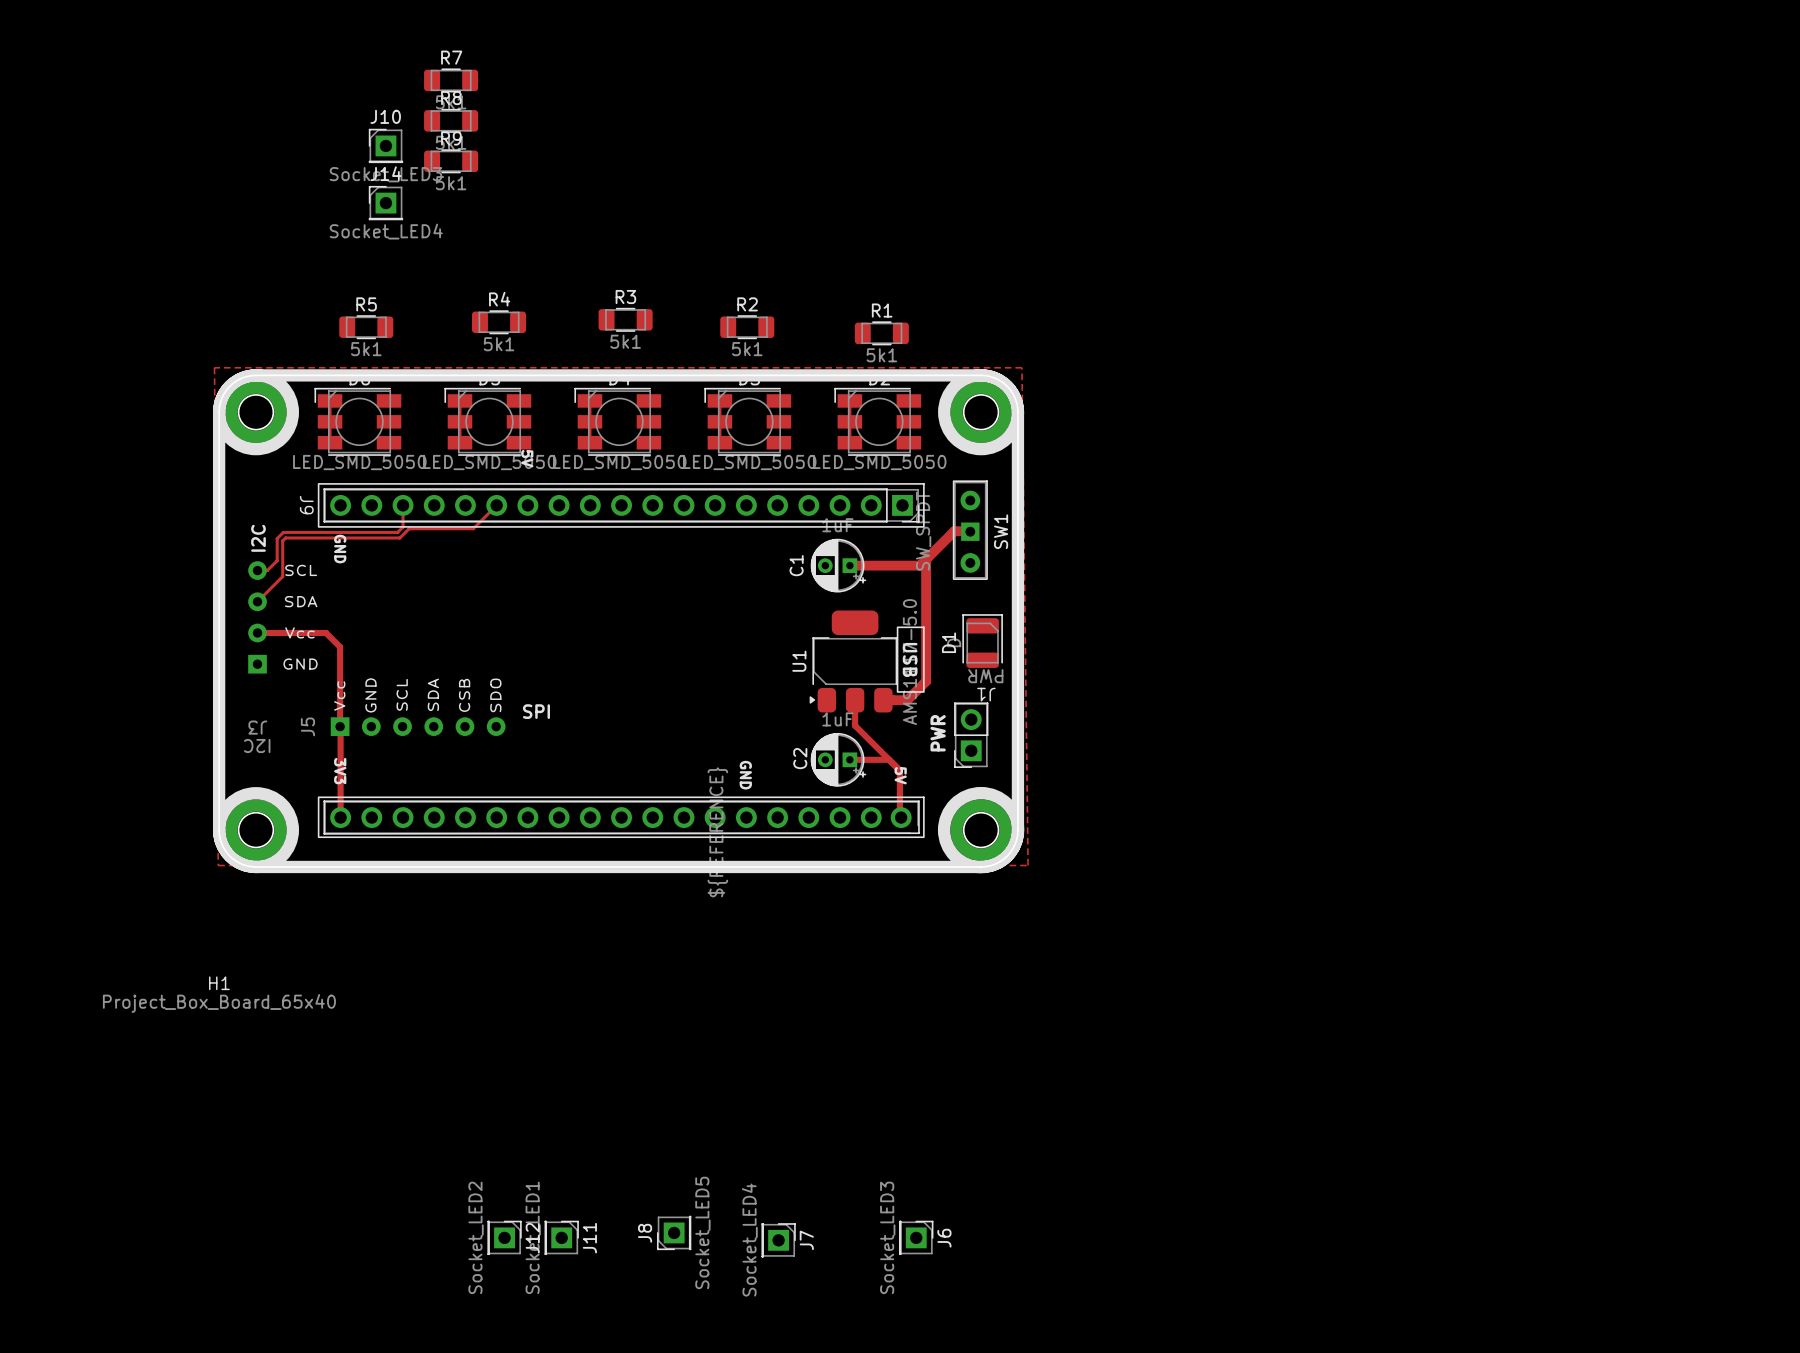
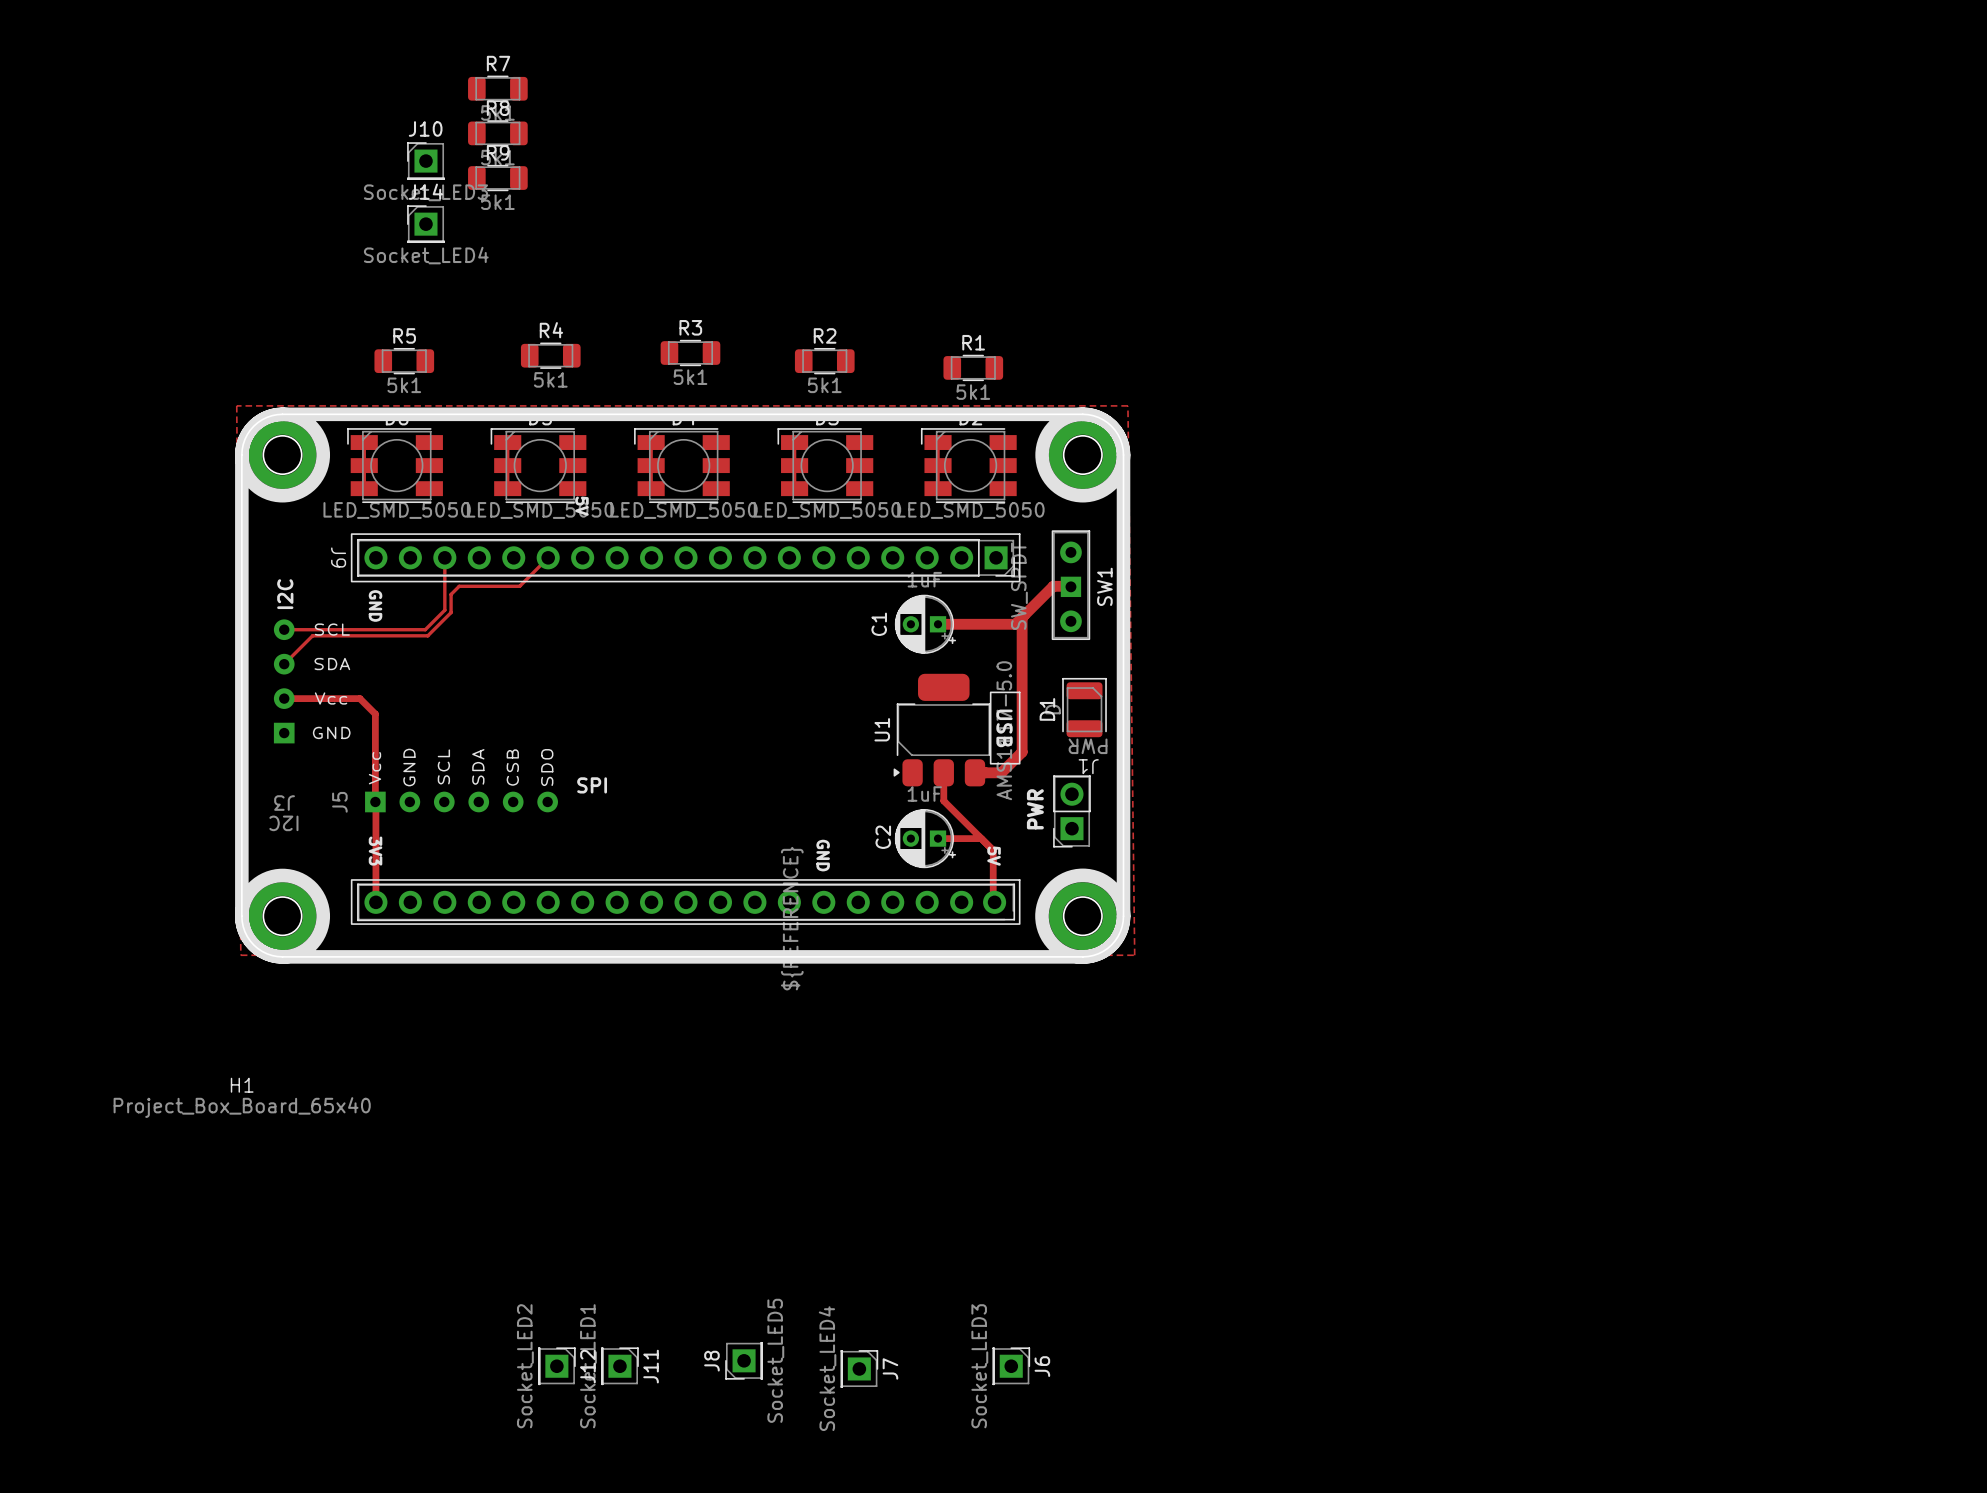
track: (403, 527) (397, 532) (283, 532) (277, 538) (277, 560) (267, 570) -> (444, 581) (444, 610) (425, 629) (295, 629)
track: (473, 528) (409, 528) (399, 537) (285, 537) (282, 540) (282, 576) -> (522, 583) (519, 586) (459, 586) (451, 594) (451, 612) (427, 635) (312, 636)

